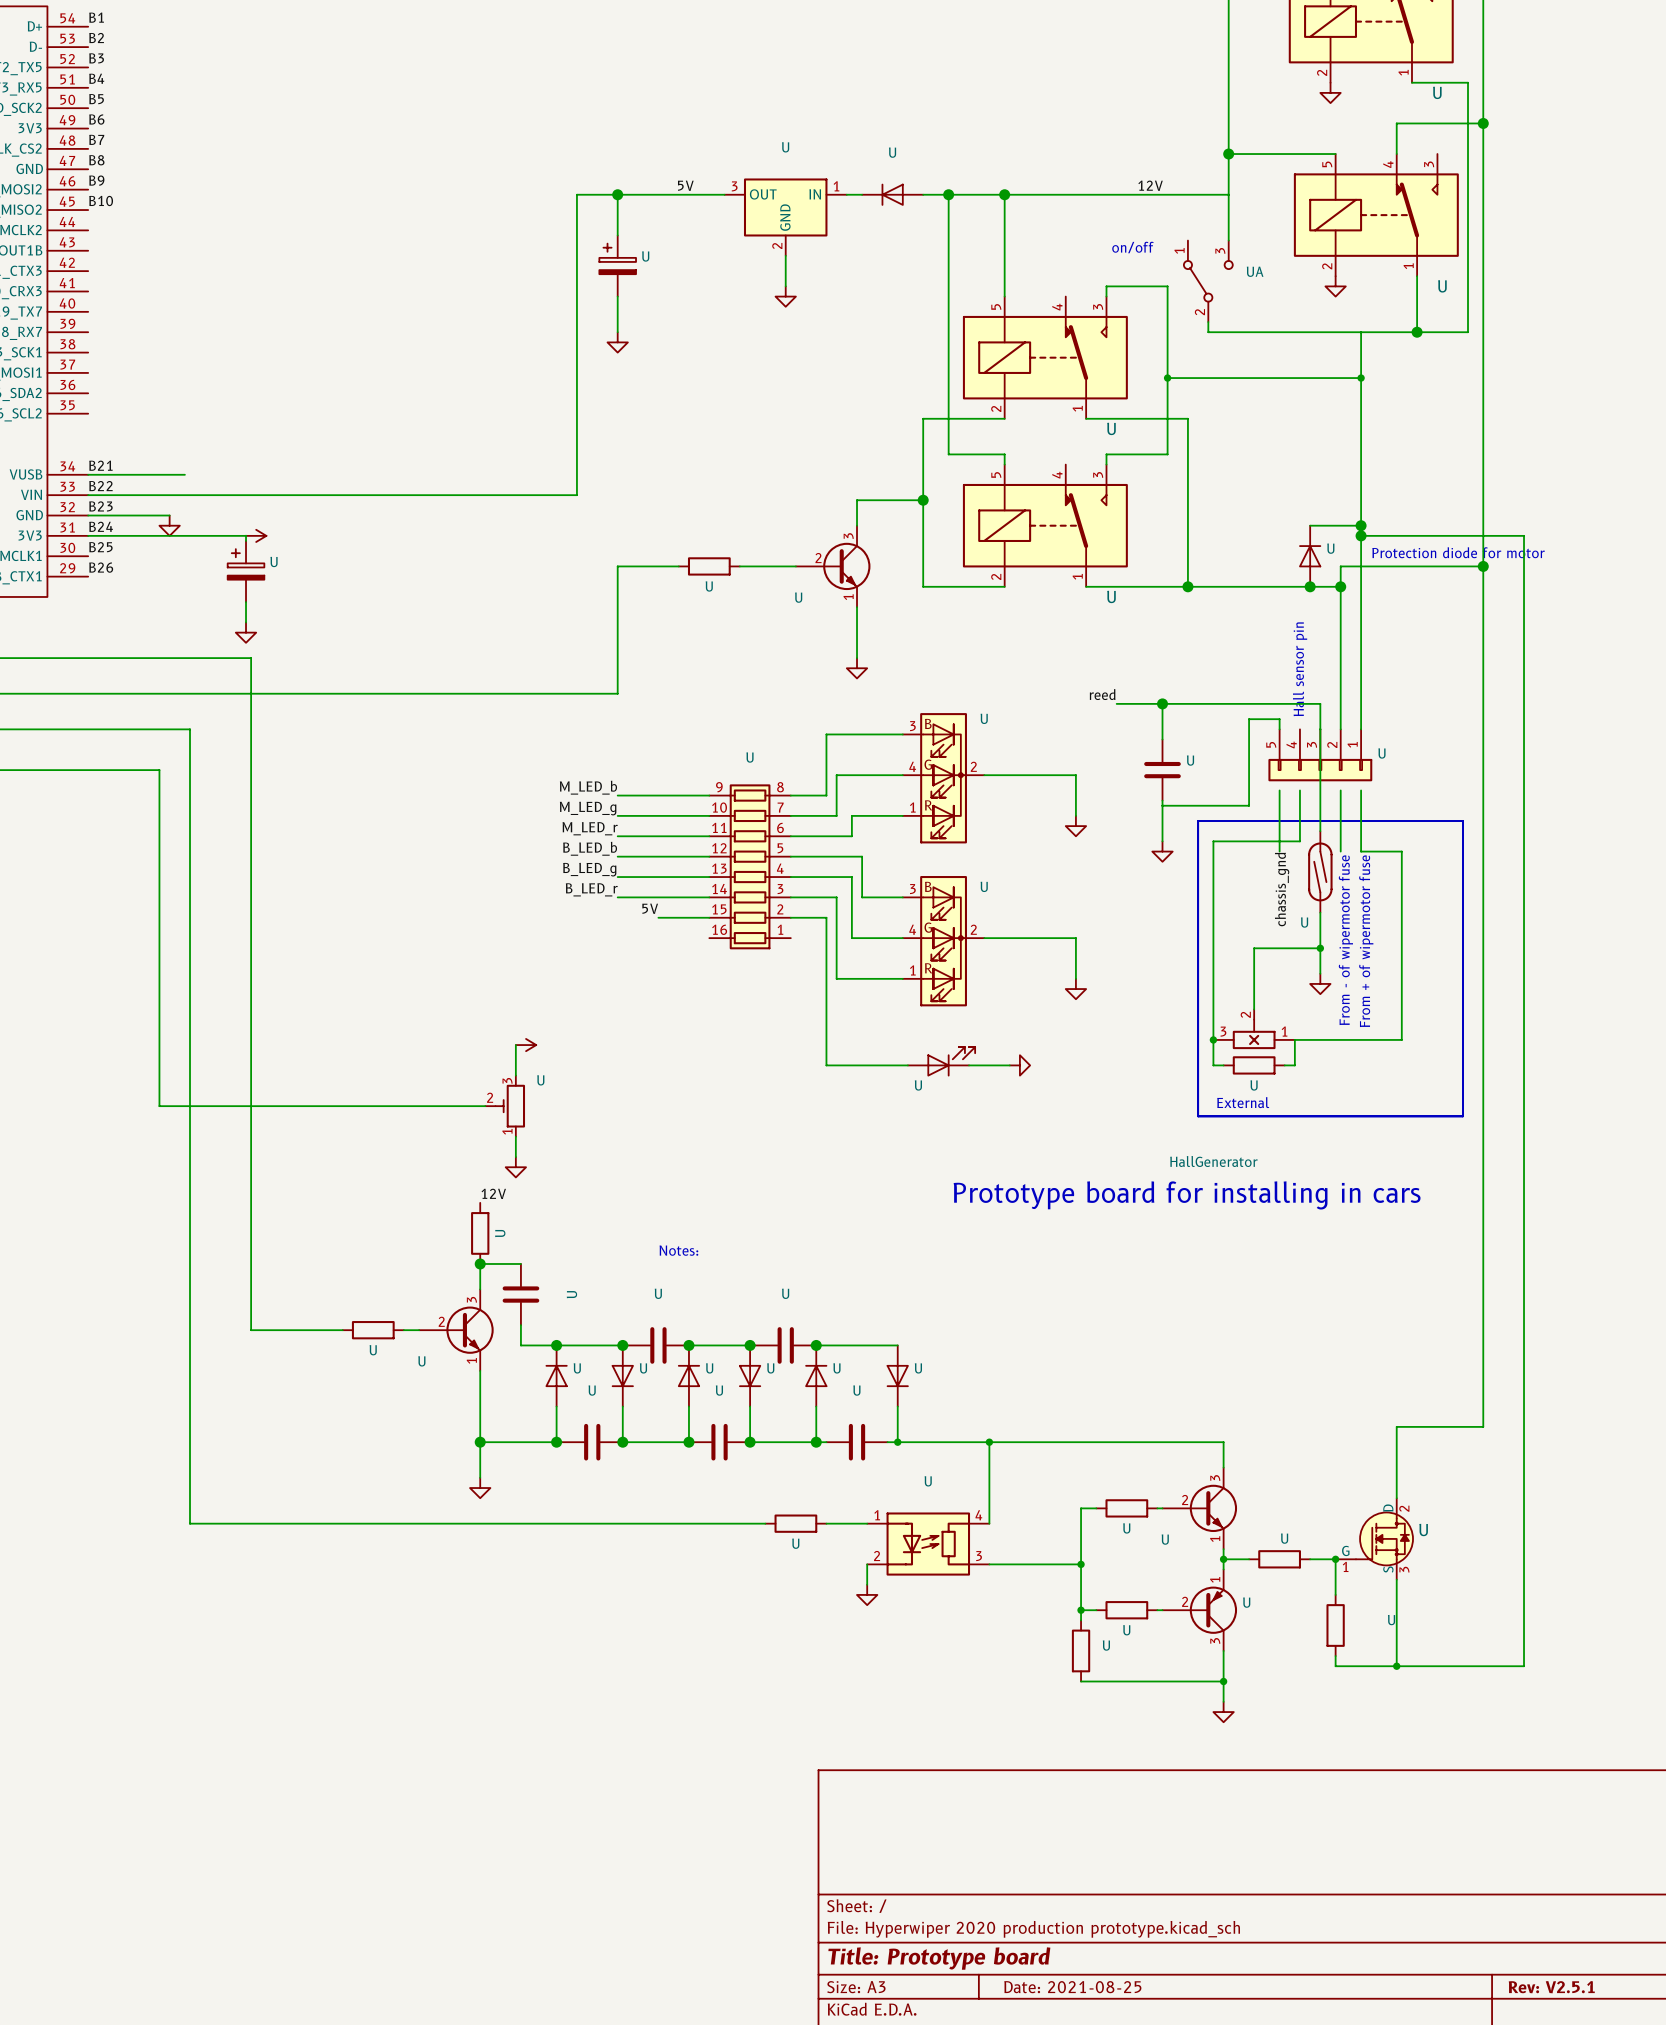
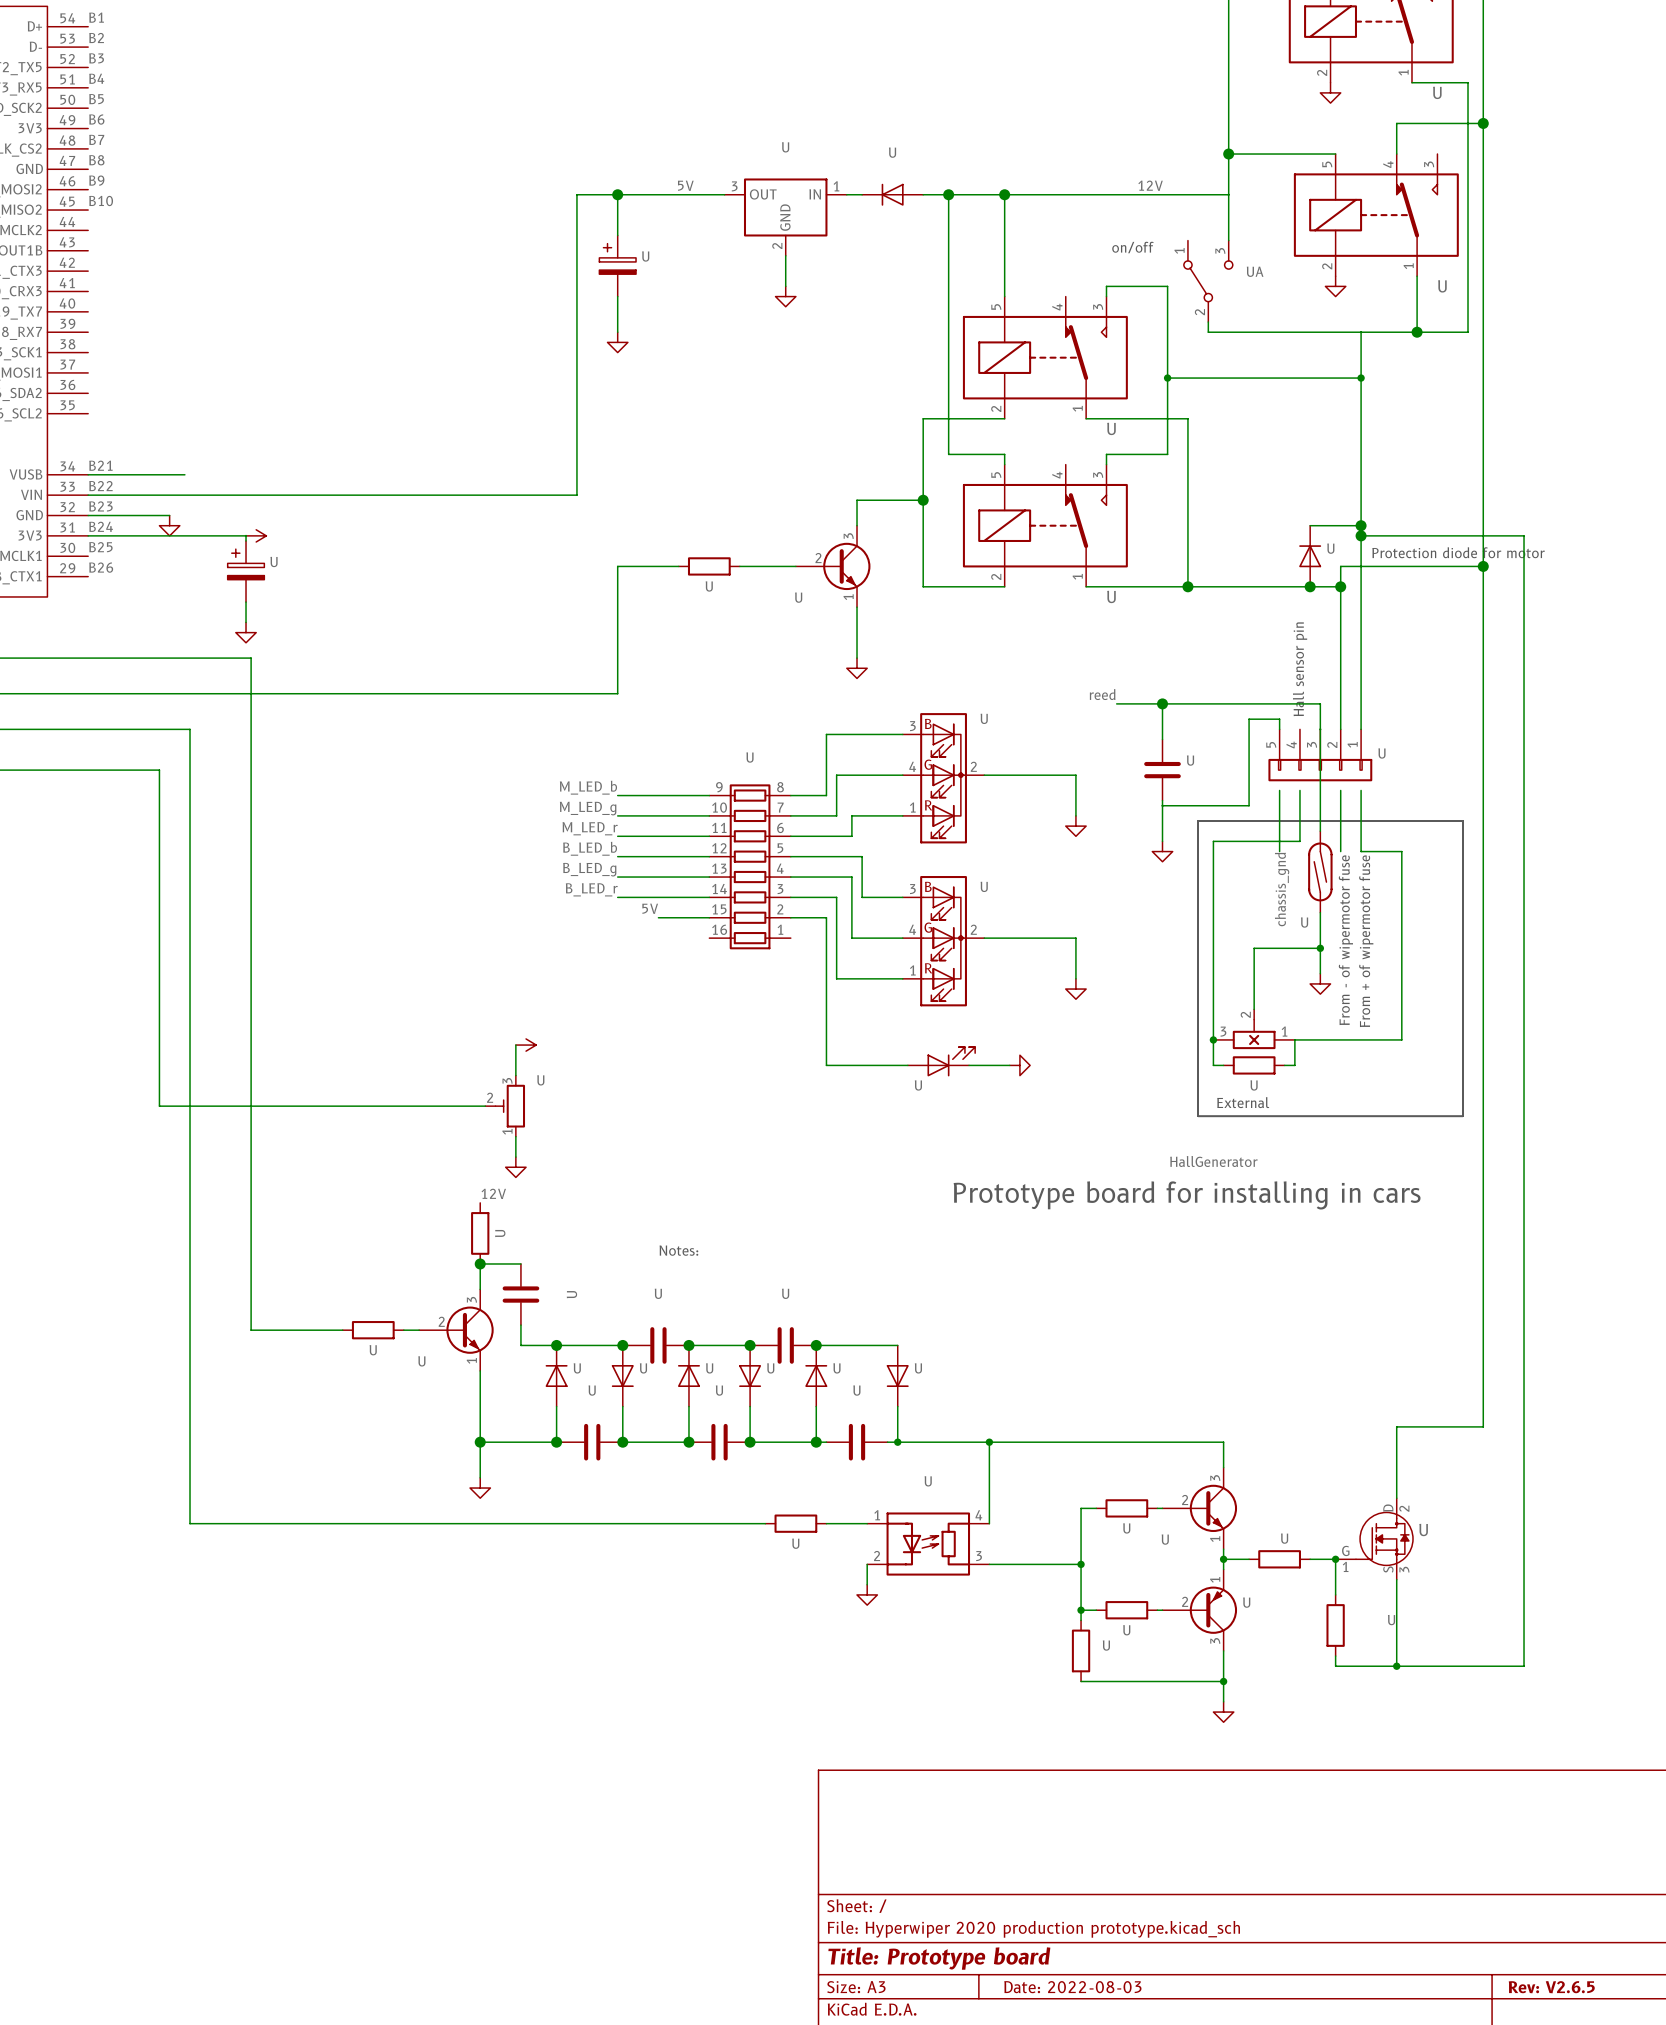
title block: Date: 2021-08-25 (1072, 1987) -> Date: 2022-08-03 (1072, 1987)
title block: Rev: V2.5.1 (1551, 1987) -> Rev: V2.6.5 (1551, 1987)

